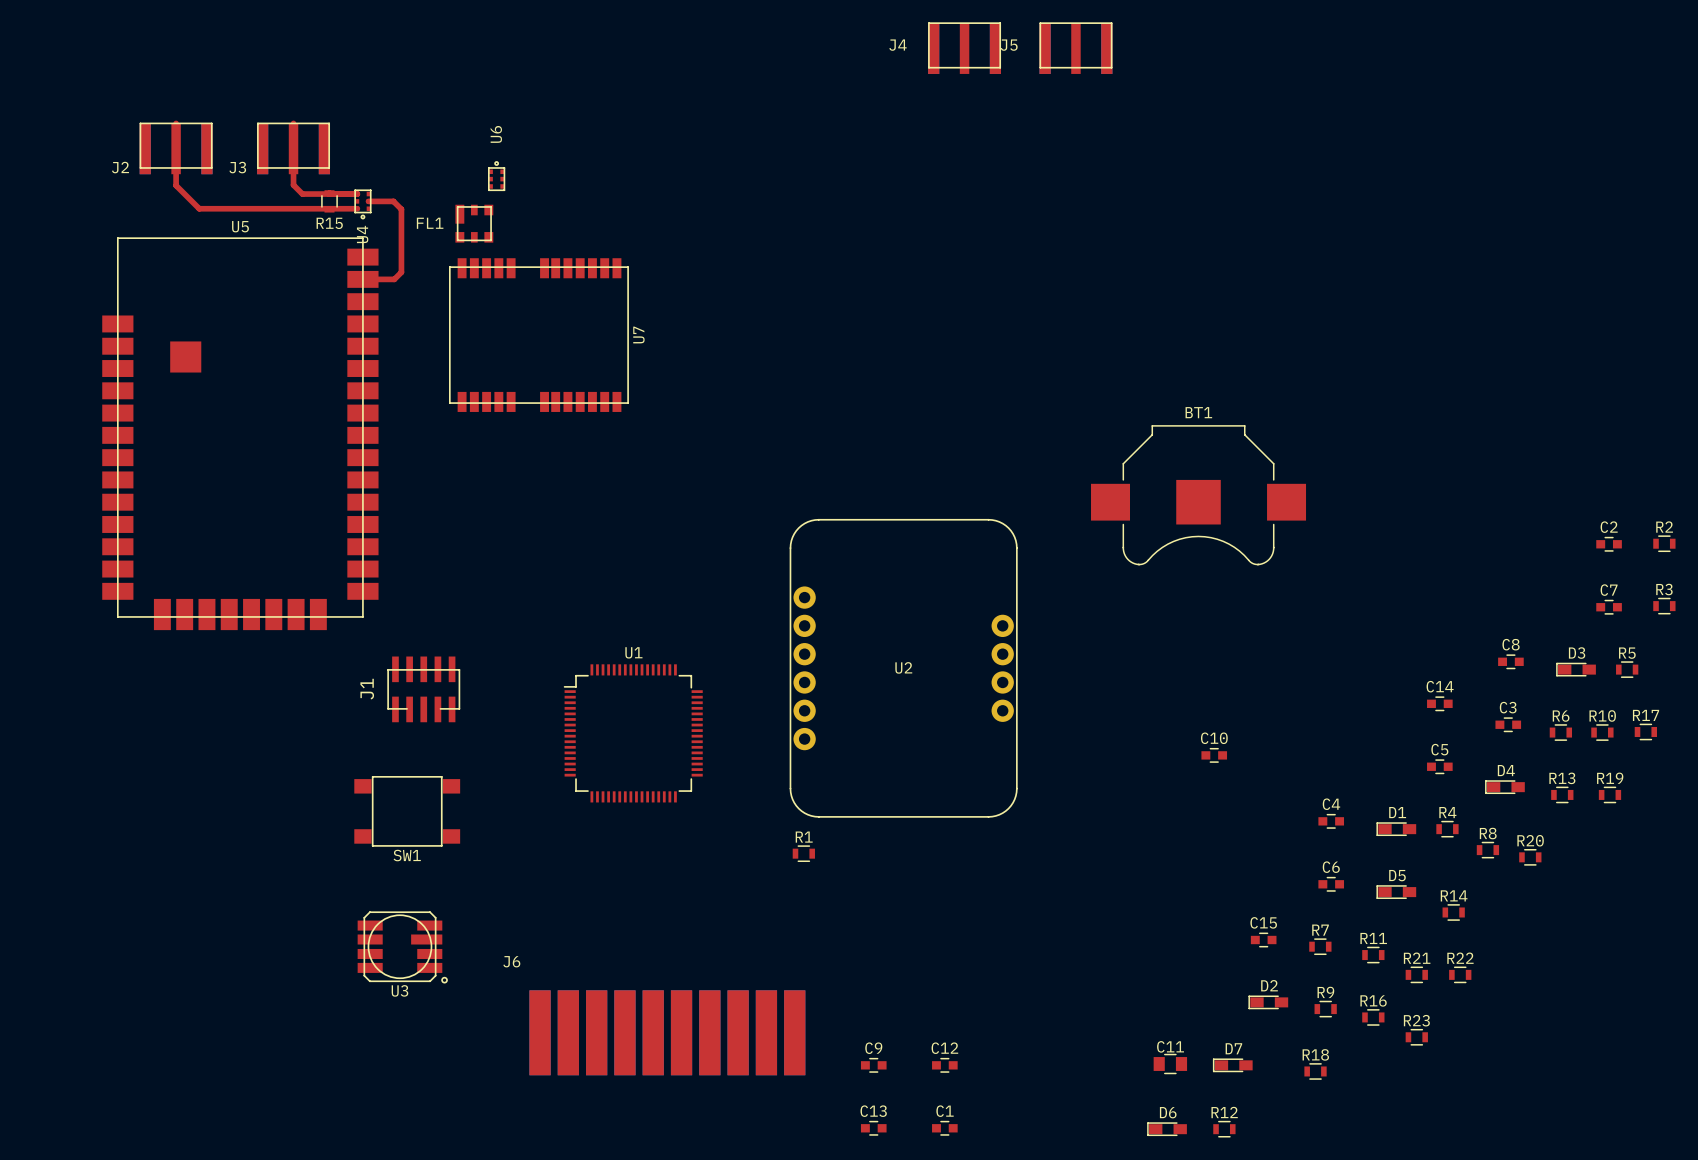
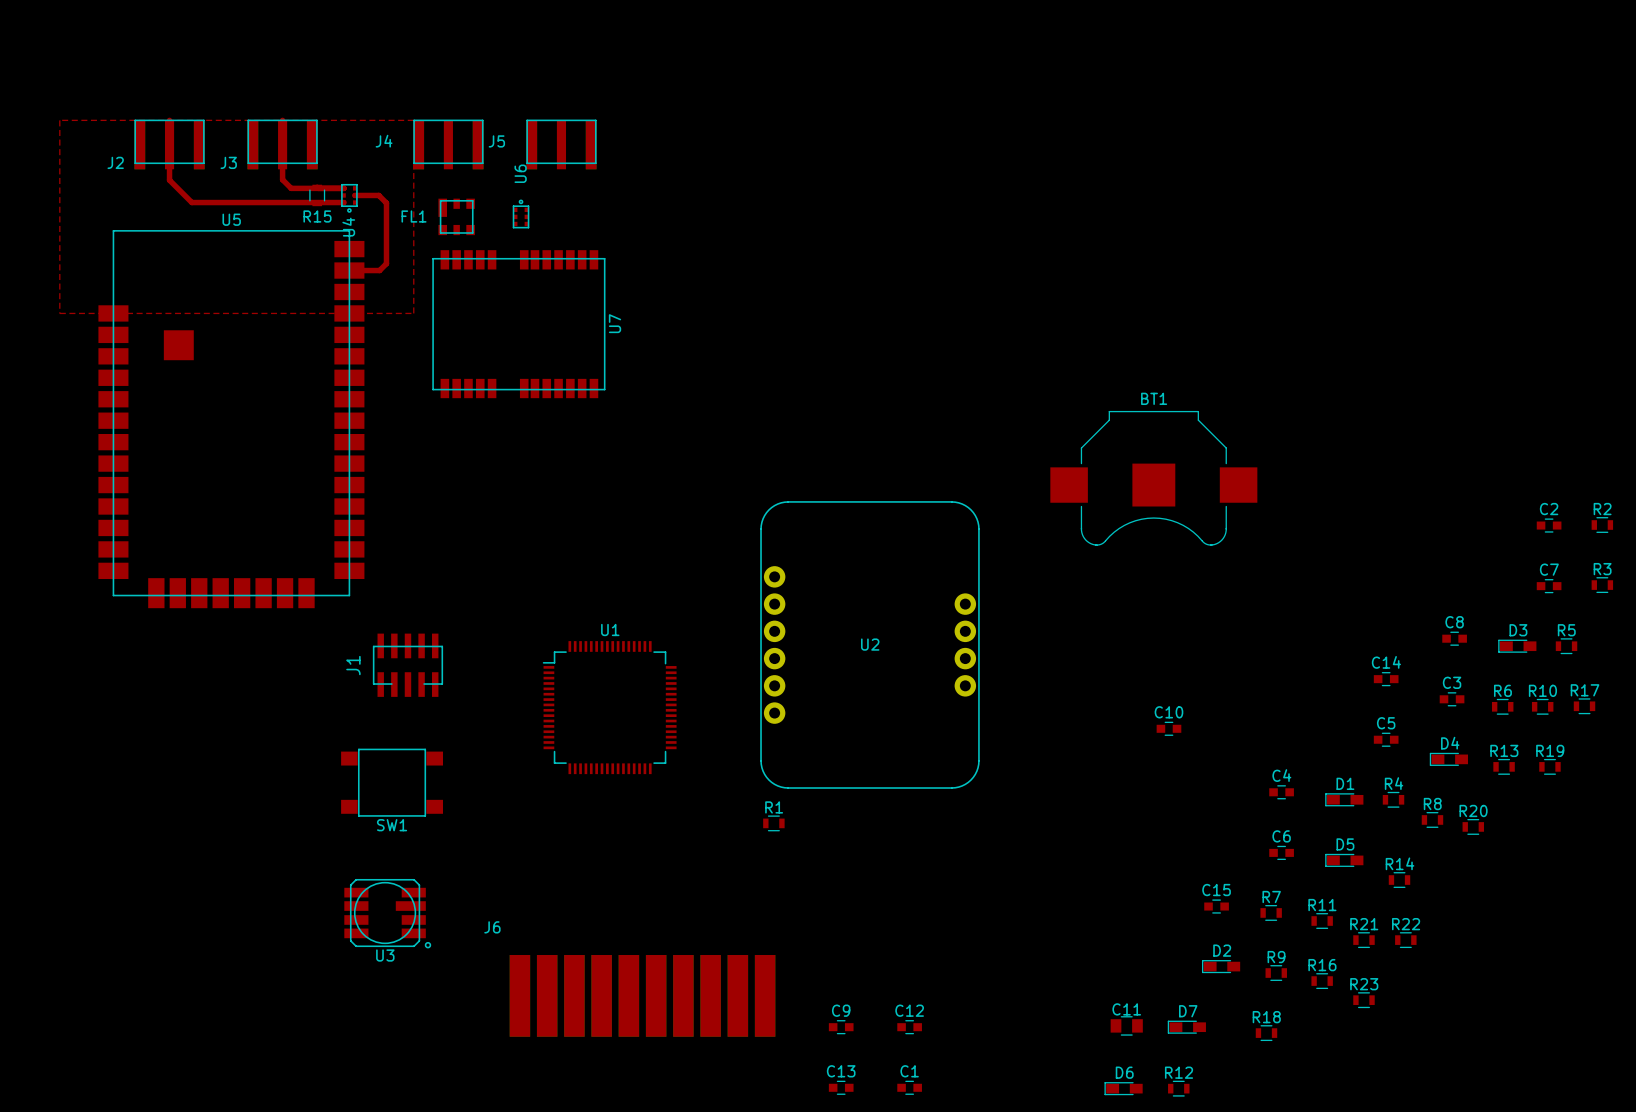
J4 position: (964, 48) -> (448, 144)
J5 position: (1075, 48) -> (561, 144)
top zone outline: none -> (59, 120) (59, 313) (413, 313) (413, 120) (59, 120)
U6 position: (496, 176) -> (521, 214)

